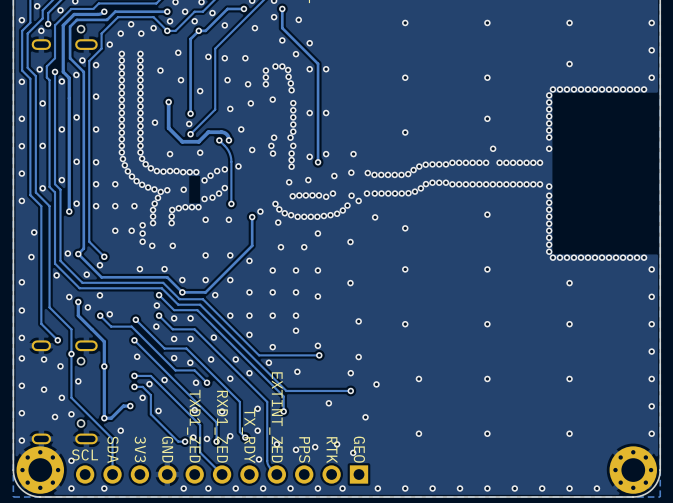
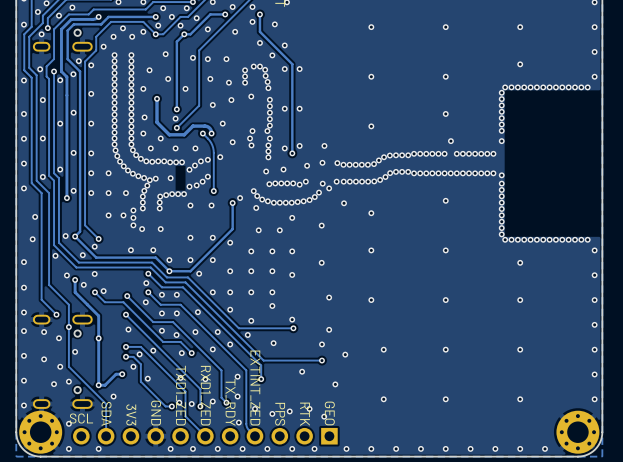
via: none -> (143, 88)
via: none -> (143, 133)
via: none -> (160, 138)
via: (200, 152) -> none
via: (170, 154) -> none
via: none -> (150, 148)
via: none -> (175, 148)
via: none -> (195, 148)

